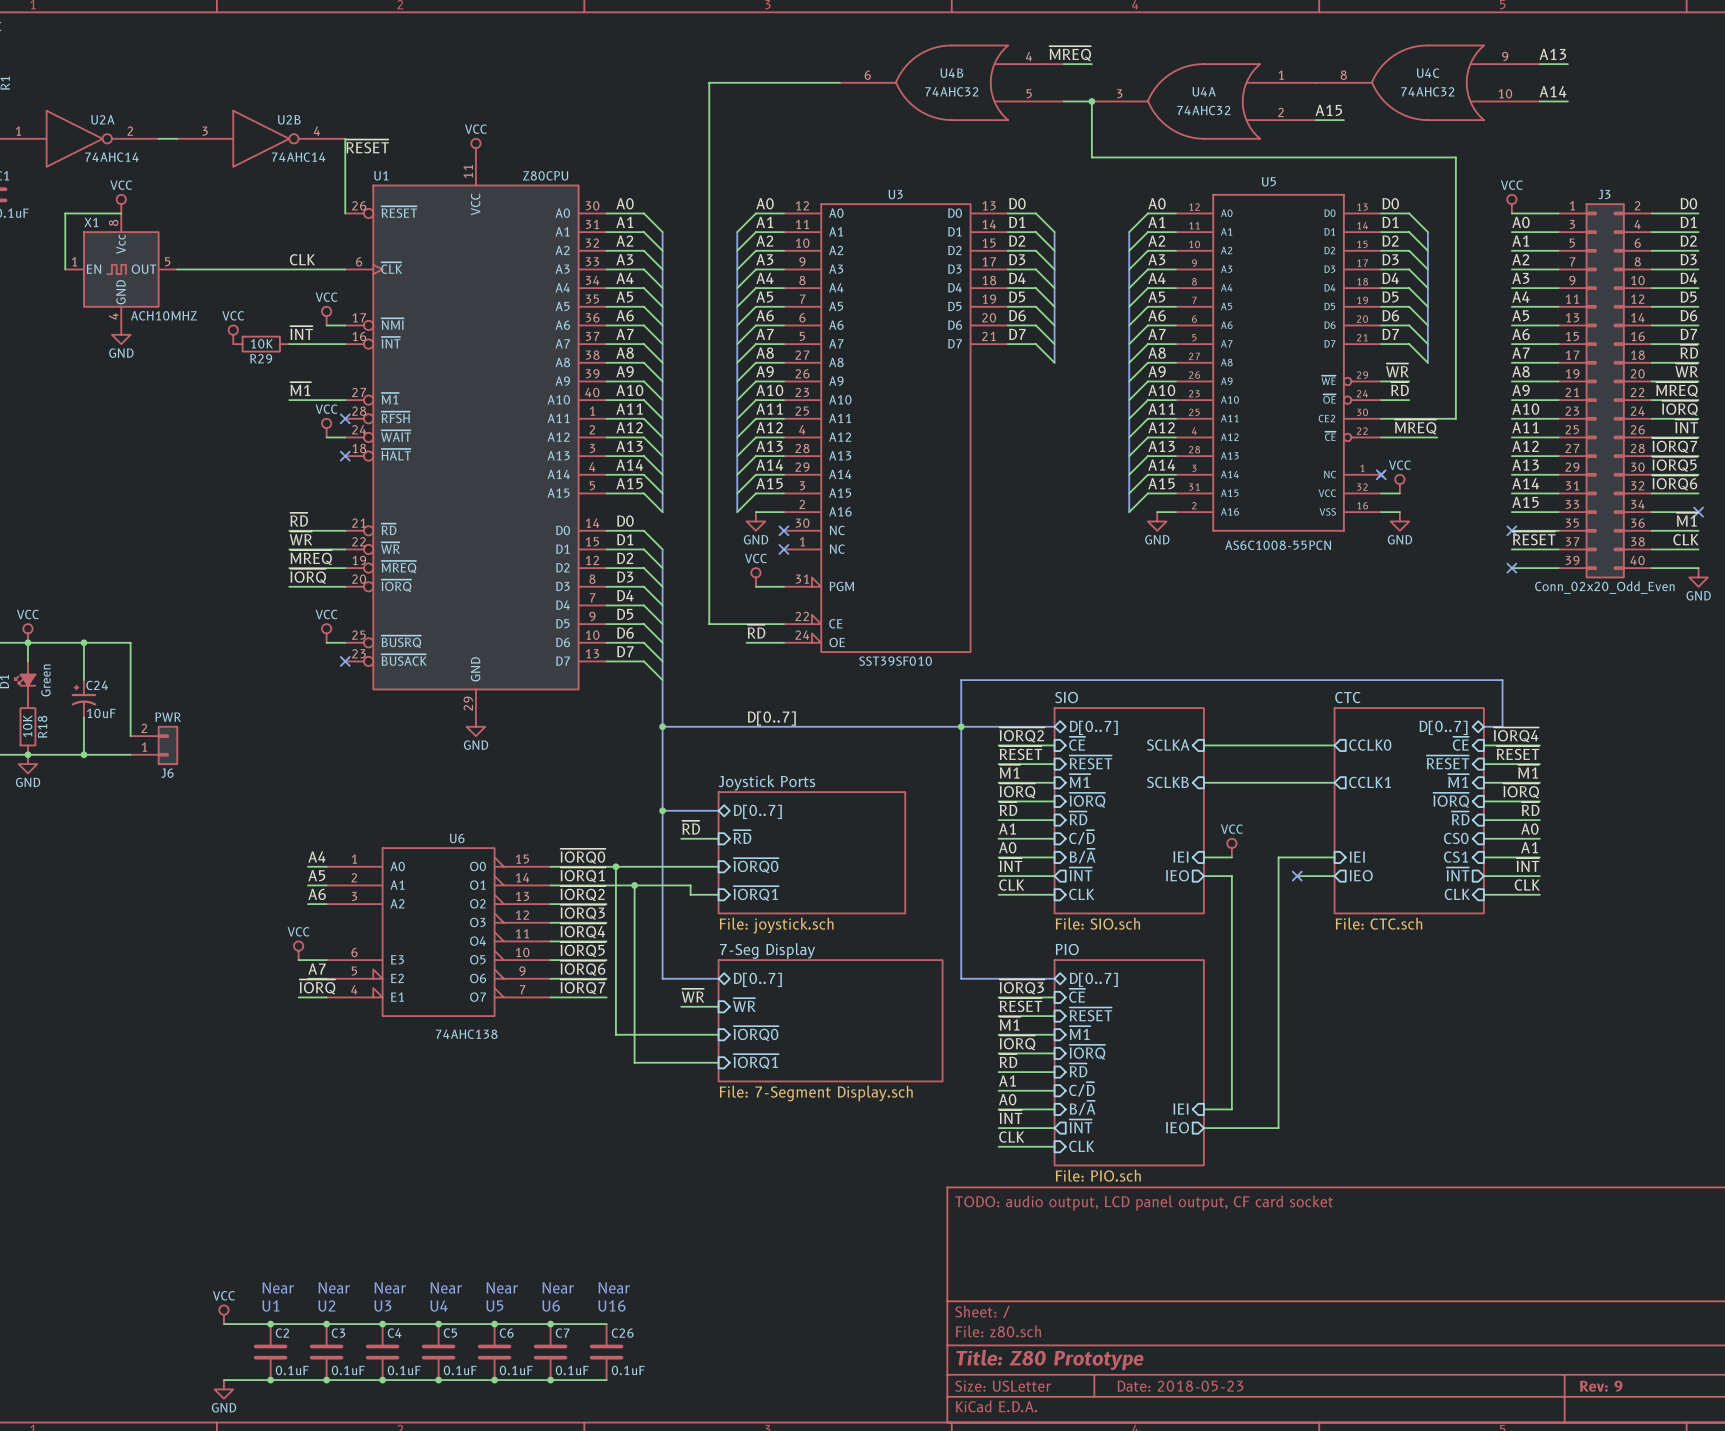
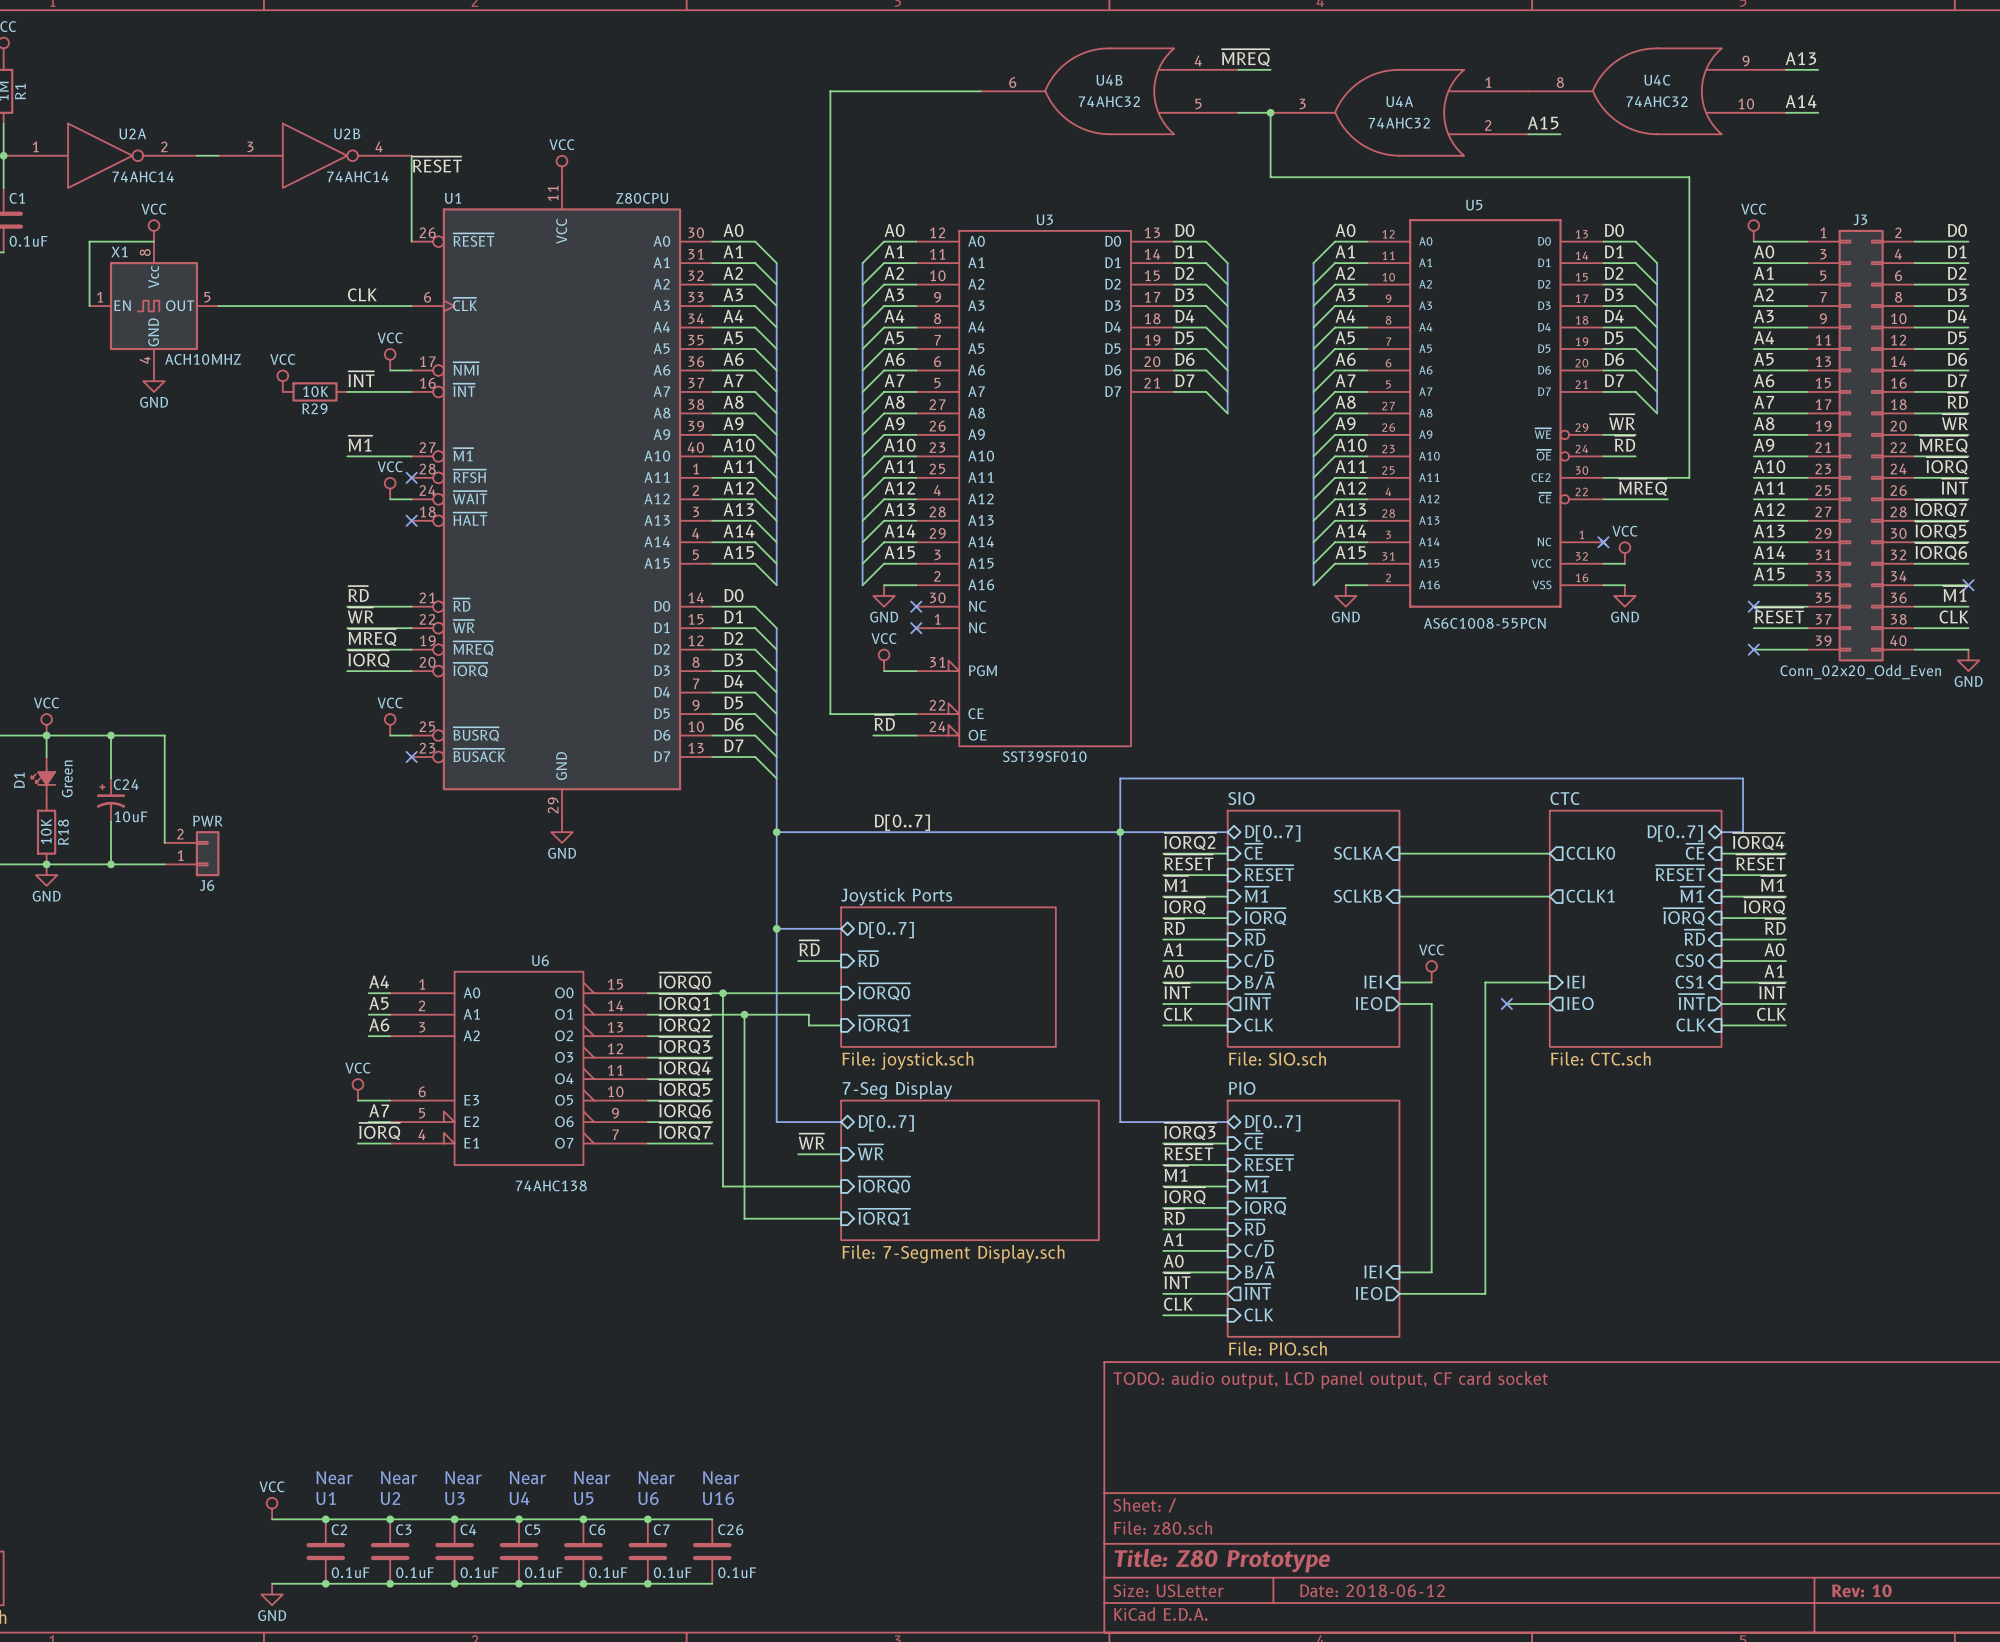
title block: Date: 2018-05-23 (1180, 1386) -> Date: 2018-06-12 (1372, 1590)
title block: Rev: 9 (1601, 1386) -> Rev: 10 (1861, 1590)

